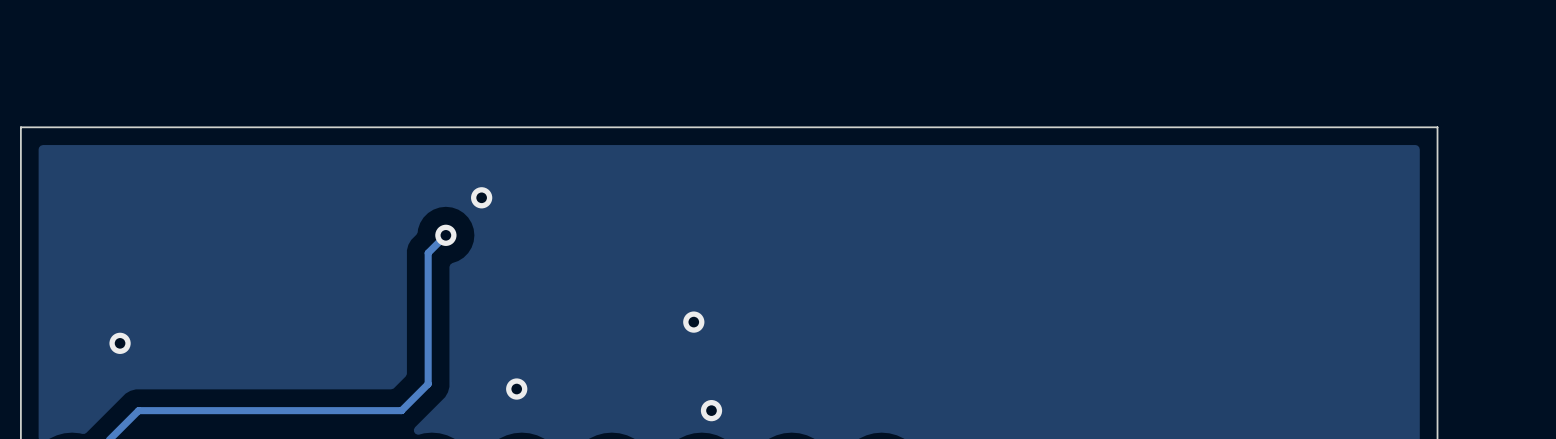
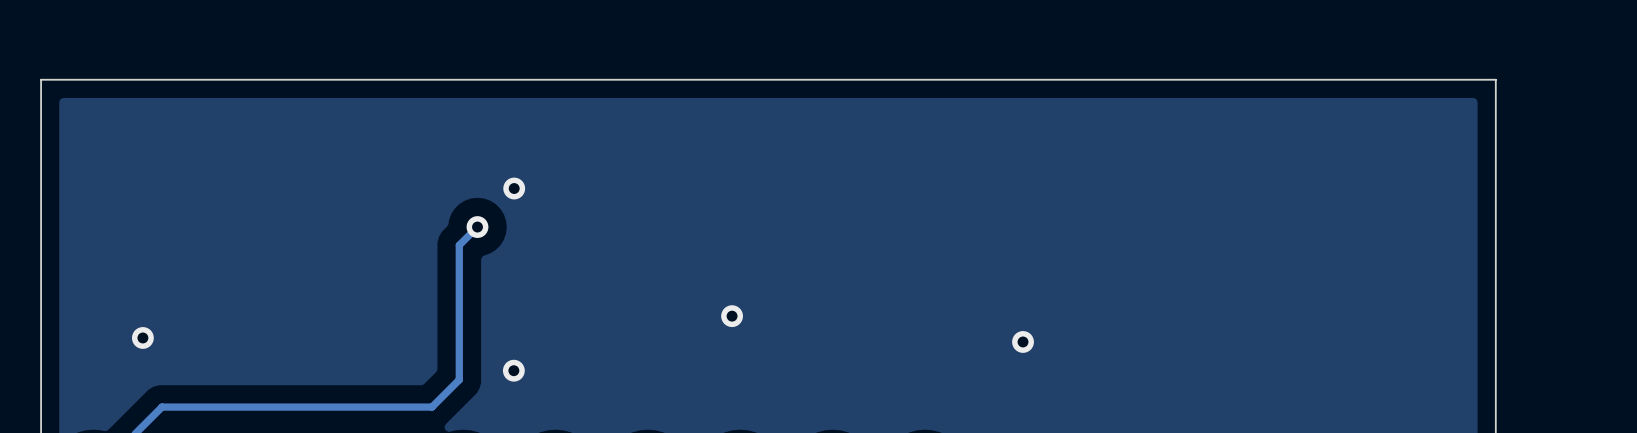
board edge: (1437, 127) (20, 127) -> (1495, 116) (1495, 79) (41, 79) (41, 116)
via: none -> (1023, 341)
via position: (516, 389) -> (513, 370)
via: (711, 410) -> none

